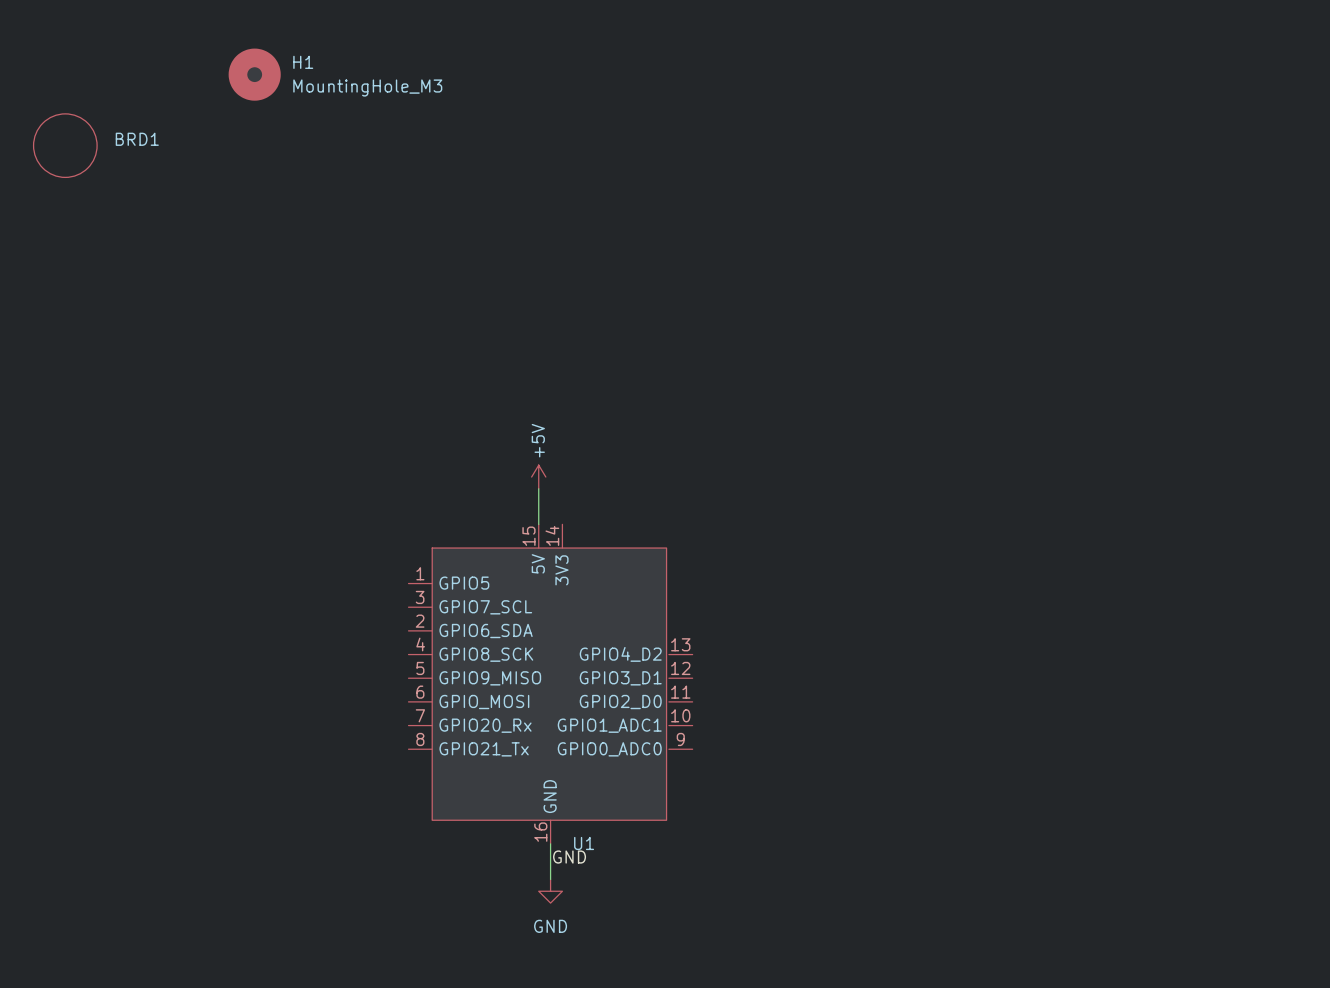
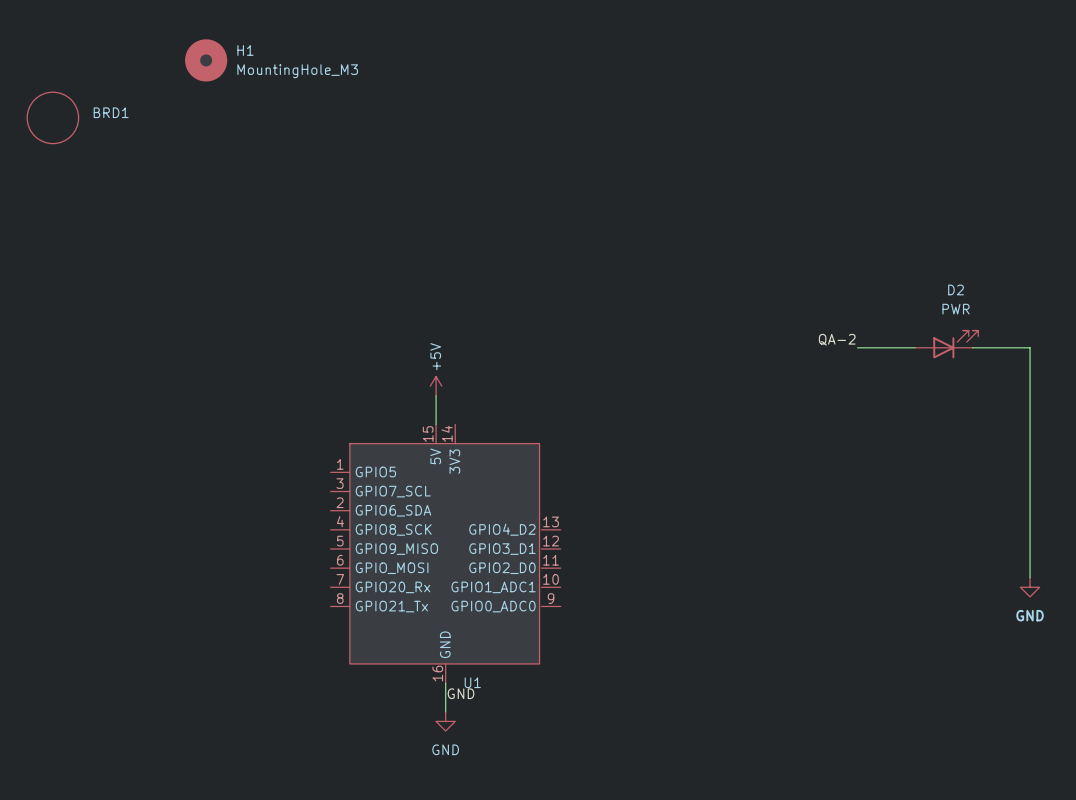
label: none -> QA-2 (837, 339)
D2: none -> PWR (946, 344)
wire: none -> (857, 347) (915, 347)
wire: none -> (972, 347) (1030, 347) (1030, 577)
power symbol: none -> GND (1030, 587)

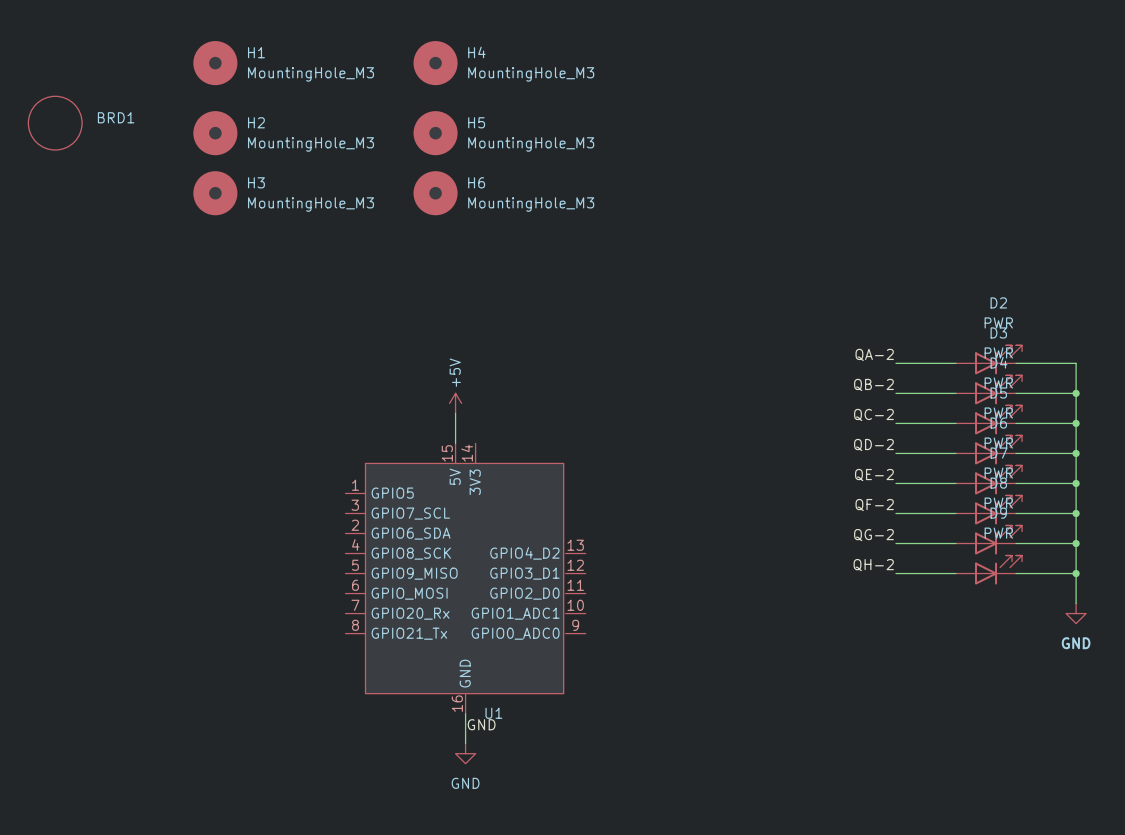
H4: none -> MountingHole_M3 (435, 63)
H2: none -> MountingHole_M3 (215, 133)
H5: none -> MountingHole_M3 (435, 133)
H3: none -> MountingHole_M3 (215, 193)
H6: none -> MountingHole_M3 (435, 193)
label: none -> QB-2 (873, 384)
D3: none -> PWR (989, 389)
wire: none -> (895, 393) (955, 393)
wire: none -> (1016, 393) (1076, 393)
junction: none -> (1076, 393)
label: none -> QC-2 (873, 414)
D4: none -> PWR (989, 419)
wire: none -> (895, 423) (955, 423)
wire: none -> (1016, 423) (1076, 423)
junction: none -> (1076, 423)
label: none -> QD-2 (873, 444)
D5: none -> PWR (989, 449)
wire: none -> (895, 453) (955, 453)
wire: none -> (1016, 453) (1076, 453)
junction: none -> (1076, 453)
label: none -> QE-2 (874, 475)
D6: none -> PWR (989, 479)
wire: none -> (895, 483) (955, 483)
wire: none -> (1016, 483) (1076, 483)
junction: none -> (1076, 483)
label: none -> QF-2 (874, 505)
D7: none -> PWR (989, 509)
wire: none -> (895, 513) (955, 513)
wire: none -> (1016, 513) (1076, 513)
junction: none -> (1076, 513)
label: none -> QG-2 (873, 535)
D8: none -> PWR (989, 540)
wire: none -> (895, 543) (955, 543)
wire: none -> (1016, 543) (1076, 543)
junction: none -> (1076, 543)
label: none -> QH-2 (873, 565)
D9: none -> PWR (989, 570)
wire: none -> (895, 573) (955, 573)
wire: none -> (1016, 573) (1076, 573)
junction: none -> (1076, 573)

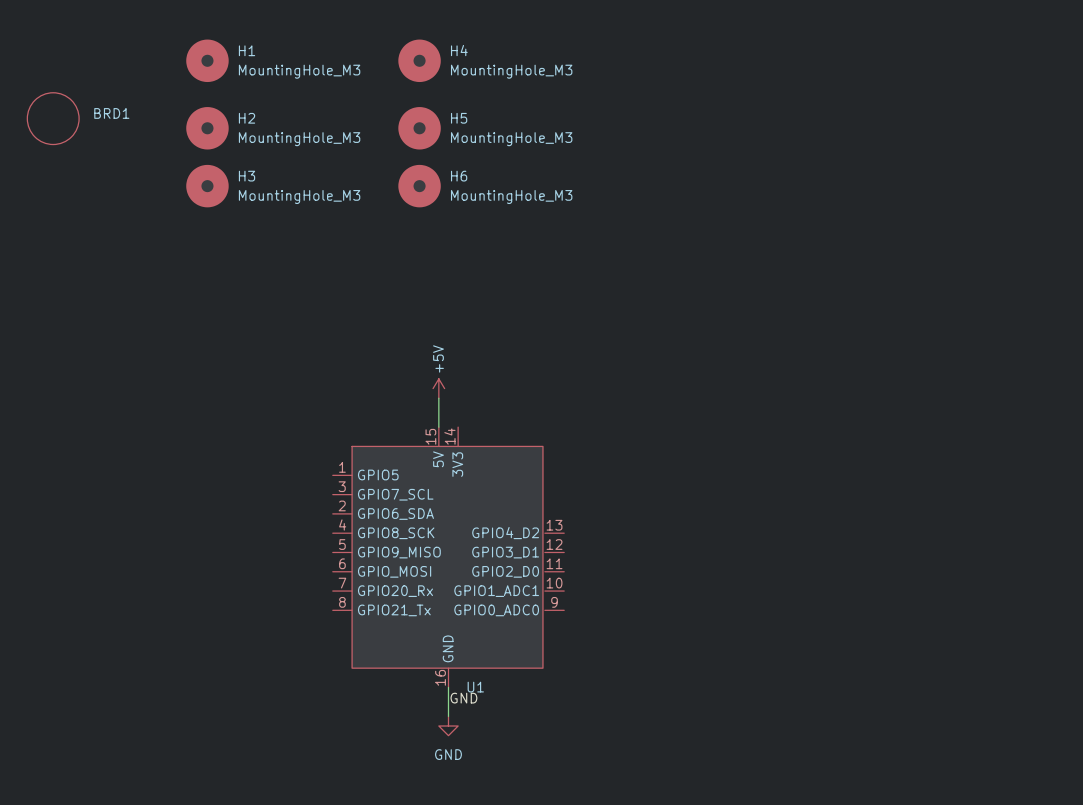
label: QA-2 (874, 354) -> none
D2: PWR (989, 359) -> none
wire: (895, 363) (955, 363) -> none
wire: (1016, 363) (1076, 363) (1076, 603) -> none
label: QB-2 (873, 384) -> none
D3: PWR (989, 389) -> none
wire: (895, 393) (955, 393) -> none
wire: (1016, 393) (1076, 393) -> none
junction: (1076, 393) -> none
label: QC-2 (873, 414) -> none
D4: PWR (989, 419) -> none
wire: (895, 423) (955, 423) -> none
wire: (1016, 423) (1076, 423) -> none
junction: (1076, 423) -> none
label: QD-2 (873, 444) -> none
D5: PWR (989, 449) -> none
wire: (895, 453) (955, 453) -> none
wire: (1016, 453) (1076, 453) -> none
junction: (1076, 453) -> none
label: QE-2 (874, 475) -> none
D6: PWR (989, 479) -> none
wire: (895, 483) (955, 483) -> none
wire: (1016, 483) (1076, 483) -> none
junction: (1076, 483) -> none
label: QF-2 (874, 505) -> none
D7: PWR (989, 509) -> none
wire: (895, 513) (955, 513) -> none
wire: (1016, 513) (1076, 513) -> none
junction: (1076, 513) -> none
label: QG-2 (873, 535) -> none
D8: PWR (989, 540) -> none
wire: (895, 543) (955, 543) -> none
wire: (1016, 543) (1076, 543) -> none
junction: (1076, 543) -> none
label: QH-2 (873, 565) -> none
D9: PWR (989, 570) -> none
wire: (895, 573) (955, 573) -> none
wire: (1016, 573) (1076, 573) -> none
junction: (1076, 573) -> none
power symbol: GND (1076, 613) -> none

